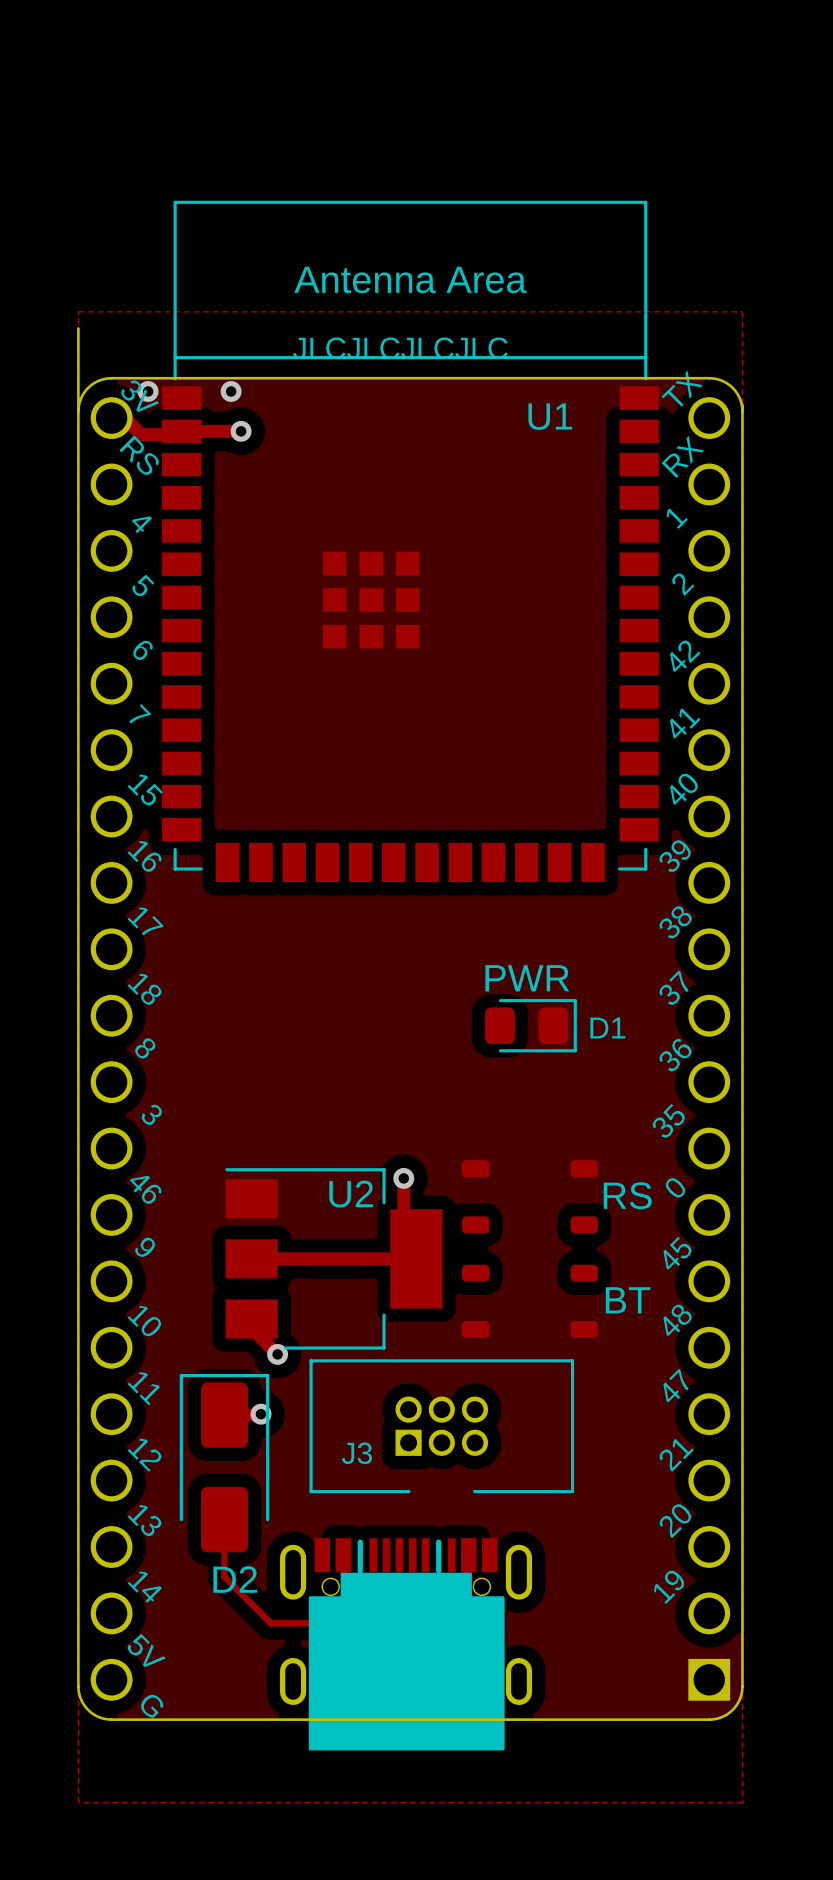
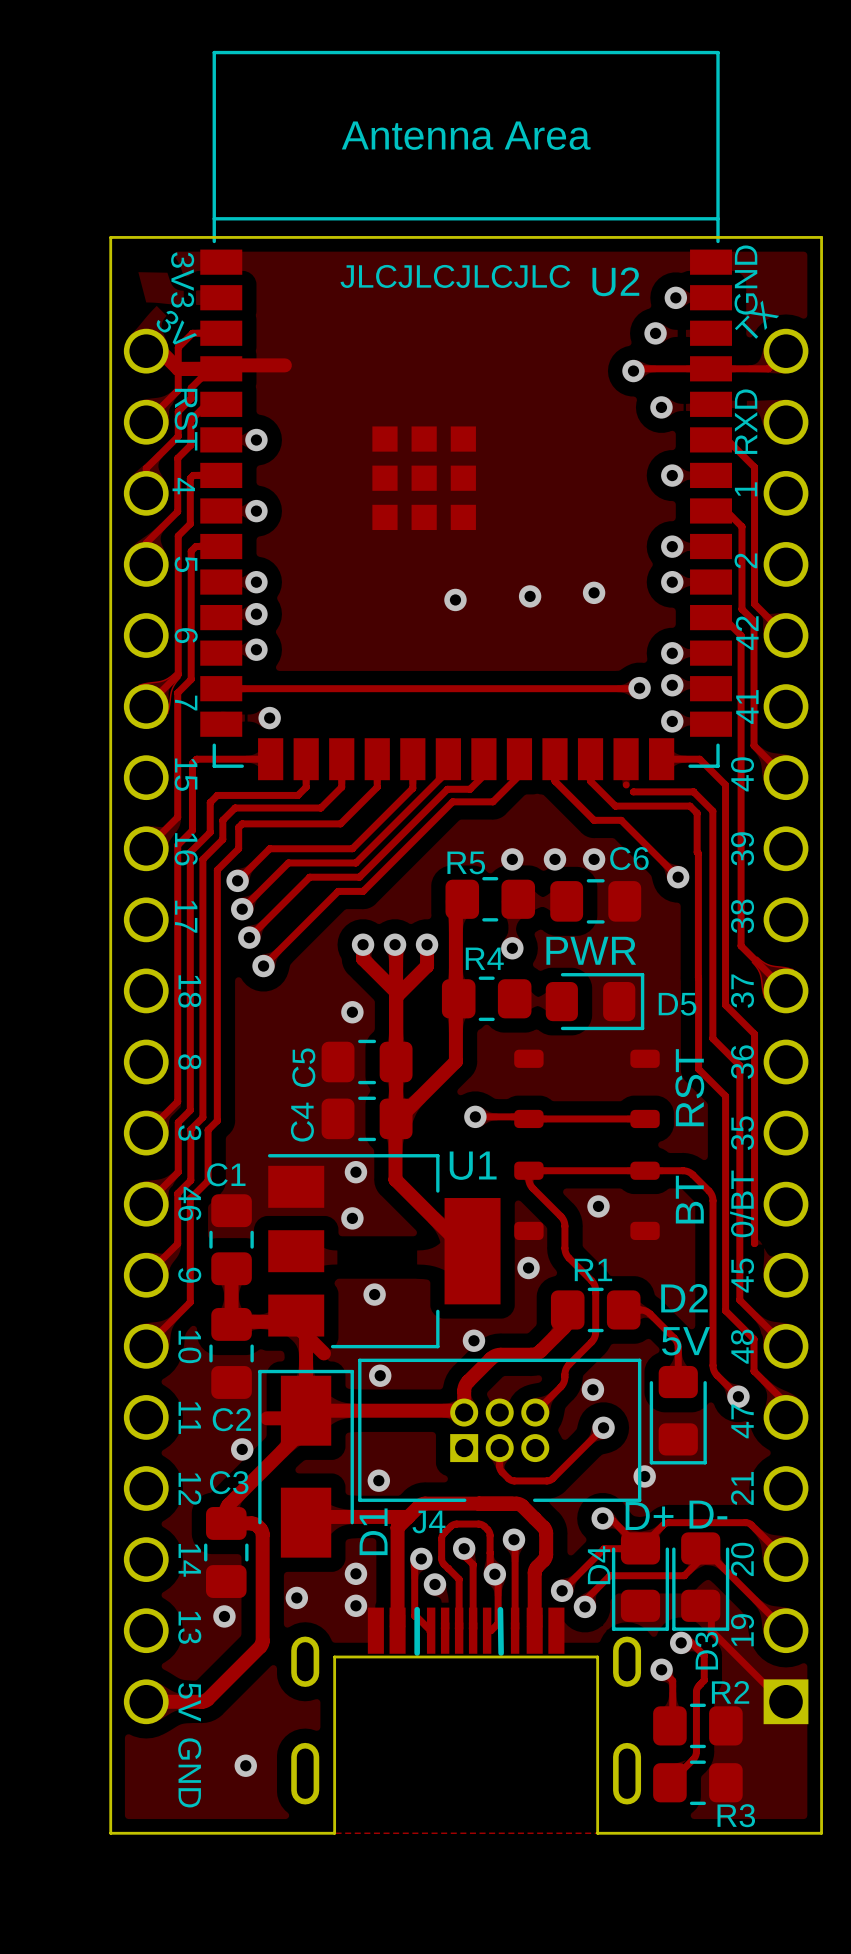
board edge: none -> (110, 255) (110, 237) (821, 237) (821, 336)
text: none -> 3V3 (182, 279)
text: none -> GND (746, 280)
via: none -> (675, 297)
via: (148, 391) -> none
via: (231, 391) -> none
track: none -> (221, 333) (192, 333) (178, 347) (178, 390) (146, 422)
via: none -> (655, 333)
board edge: (78, 411) (81, 397) (88, 387) (100, 380) (111, 378) (709, 378) (723, 381) (732, 387) (740, 400) (742, 411) -> none
track: none -> (786, 351) (768, 368) (634, 368) (633, 371)
via: (241, 431) -> none
track: none -> (178, 368) (210, 368) (191, 387) (191, 398) (178, 411) (178, 436) (146, 468) (146, 493)
via: none -> (633, 371)
text: RS (139, 455) -> RST (186, 419)
text: RX (682, 456) -> RXD (746, 421)
track: none -> (221, 404) (206, 404) (190, 420) (190, 445) (177, 458) (177, 511) (146, 543) (146, 564)
via: none -> (661, 407)
U2: none -> (466, 415)
track: none -> (711, 439) (727, 439) (754, 467) (754, 603) (786, 635)
via: none -> (256, 440)
text rotation: 0° (677, 518) -> 45° counterclockwise (746, 489)
text rotation: 0° (141, 524) -> 45° clockwise (183, 486)
track: none -> (221, 475) (193, 475) (190, 478) (190, 523) (178, 536) (178, 674) (146, 706)
via: none -> (672, 475)
U1: (410, 541) -> none
via: none -> (256, 511)
track: none -> (711, 510) (726, 511) (741, 526) (741, 609) (754, 621) (754, 745) (786, 777)
text rotation: 0° (683, 584) -> 45° counterclockwise (745, 560)
text rotation: 0° (143, 585) -> 45° clockwise (186, 564)
track: none -> (221, 546) (196, 546) (191, 551) (191, 679) (177, 693) (177, 817) (146, 848)
via: none -> (672, 546)
via: none -> (256, 582)
via: none -> (672, 582)
via: none -> (594, 592)
via: none -> (530, 596)
text rotation: 0° (143, 650) -> 45° clockwise (186, 635)
via: none -> (455, 599)
text rotation: 0° (685, 656) -> 45° counterclockwise (747, 633)
via: none -> (256, 614)
track: none -> (711, 617) (723, 617) (741, 635) (741, 945) (786, 990)
via: none -> (256, 649)
via: none -> (672, 653)
text rotation: 0° (140, 713) -> 45° clockwise (186, 703)
zone outline: none -> (175, 672) (164, 680) (138, 685) (138, 714) (167, 713) (172, 688) (180, 677) (175, 672)
text rotation: 0° (685, 723) -> 45° counterclockwise (747, 707)
via: none -> (672, 685)
track: none -> (639, 688) (221, 688)
via: none -> (639, 688)
via: none -> (269, 718)
via: none -> (672, 721)
text rotation: 0° (145, 789) -> 45° clockwise (186, 774)
text rotation: 0° (684, 789) -> 45° counterclockwise (742, 774)
track: none -> (270, 759) (196, 759) (192, 763) (192, 830) (177, 845) (177, 1101) (146, 1133)
track: none -> (306, 759) (306, 787) (297, 795) (217, 795) (210, 802) (210, 832) (190, 852) (190, 1110) (178, 1122) (178, 1172) (146, 1204)
track: none -> (341, 759) (341, 787) (321, 807) (235, 808) (222, 820) (222, 839) (202, 859) (202, 1117) (190, 1129) (190, 1180) (177, 1193) (177, 1243) (146, 1275)
track: none -> (377, 759) (377, 787) (340, 823) (242, 823) (238, 827) (238, 848) (217, 870) (217, 1120) (208, 1130) (208, 1180) (190, 1198) (190, 1302) (146, 1346)
track: none -> (412, 759) (412, 788) (352, 848) (269, 848) (237, 880)
track: none -> (448, 759) (448, 770) (356, 862) (288, 863) (242, 909)
track: none -> (483, 759) (483, 775) (470, 789) (447, 789) (359, 877) (309, 877) (249, 937)
track: none -> (519, 759) (519, 775) (493, 801) (452, 801) (363, 891) (338, 891) (263, 966)
track: none -> (554, 759) (555, 781) (593, 820) (621, 820) (678, 877)
track: none -> (590, 759) (590, 781) (615, 806) (689, 806) (697, 813) (698, 977)
track: none -> (661, 759) (699, 759) (725, 785) (725, 1004) (754, 1034) (754, 1243)
track: none -> (626, 784) (626, 784)
track: none -> (633, 791) (693, 791)
track: none -> (693, 791) (712, 811) (712, 1038) (739, 1065) (739, 1300) (786, 1346)
text rotation: 0° (145, 856) -> 45° clockwise (186, 849)
text rotation: 0° (675, 856) -> 45° counterclockwise (742, 848)
via: none -> (512, 859)
via: none -> (554, 859)
via: none -> (594, 859)
via: none -> (678, 877)
via: none -> (237, 880)
text rotation: 0° (145, 921) -> 45° clockwise (186, 916)
text rotation: 0° (675, 922) -> 45° counterclockwise (742, 916)
R5: none -> (490, 899)
track: none -> (459, 902) (455, 905) (455, 1061) (398, 1118) (396, 1118) (395, 944)
C6: none -> (595, 901)
via: none -> (242, 909)
via: none -> (249, 937)
track: none -> (363, 944) (363, 959) (396, 992)
via: none -> (363, 944)
via: none -> (395, 944)
track: none -> (427, 944) (426, 966) (396, 997)
via: none -> (427, 944)
via: none -> (512, 948)
zone outline: none -> (757, 956) (767, 964) (793, 969) (793, 998) (764, 998) (759, 972) (752, 961) (757, 956)
text rotation: 0° (673, 987) -> 45° counterclockwise (742, 991)
text rotation: 0° (144, 989) -> 45° clockwise (189, 991)
via: none -> (263, 966)
track: none -> (698, 977) (698, 1068) (725, 1096) (725, 1310) (753, 1339) (754, 1371) (785, 1403) (786, 1417)
R4: none -> (486, 998)
D1 name: D1 (607, 1028) -> D5 (677, 1004)
via: none -> (352, 1012)
text rotation: 0° (145, 1048) -> 45° clockwise (189, 1062)
text rotation: 0° (675, 1054) -> 45° counterclockwise (742, 1062)
C5: none -> (367, 1062)
part: none -> RST (586, 1088)
text rotation: 0° (151, 1114) -> 45° clockwise (189, 1133)
text rotation: 0° (668, 1120) -> 45° counterclockwise (742, 1133)
track: none -> (475, 1116) (645, 1118)
C4: none -> (367, 1118)
track: none -> (395, 1122) (395, 1179) (472, 1257)
track: (403, 1178) (403, 1246) (416, 1258) (251, 1258) -> none
via position: (403, 1178) -> (475, 1116)
via: none -> (355, 1172)
text: 0 (675, 1187) -> none
text rotation: 0° (146, 1189) -> 45° clockwise (189, 1203)
U2 name: U2 (351, 1194) -> U1 (473, 1165)
part value: RS (627, 1195) -> BT (689, 1199)
part position: (529, 1196) -> (586, 1200)
text: none -> 0/BT (742, 1203)
via: none -> (598, 1206)
via: none -> (352, 1218)
text rotation: 0° (145, 1247) -> 45° clockwise (189, 1275)
C1: none -> (231, 1239)
text rotation: 0° (677, 1253) -> 45° counterclockwise (742, 1275)
via: none -> (528, 1267)
track: none -> (231, 1268) (231, 1324) (234, 1321) (293, 1321) (305, 1331) (305, 1425) (226, 1509) (226, 1523) (253, 1523) (262, 1532) (261, 1644) (205, 1700) (146, 1701)
via: none -> (374, 1294)
part: BT (529, 1301) -> none
track: none -> (567, 1309) (567, 1319) (564, 1326) (538, 1352) (532, 1354) (498, 1354) (490, 1358) (465, 1384) (464, 1412)
R1: none -> (595, 1309)
track: none -> (623, 1309) (646, 1311) (675, 1339) (678, 1346) (678, 1382)
text rotation: 0° (677, 1320) -> 45° counterclockwise (742, 1346)
text rotation: 0° (144, 1321) -> 45° clockwise (189, 1346)
via: none -> (473, 1340)
D2 value: none -> 5V (685, 1341)
C2: none -> (231, 1353)
via: (277, 1354) -> none
D2 footprint: [179, 1373, 270, 1553] -> [649, 1365, 707, 1465]
via: none -> (380, 1375)
text rotation: 0° (676, 1385) -> 45° counterclockwise (742, 1421)
text rotation: 0° (143, 1388) -> 45° clockwise (189, 1417)
via: none -> (592, 1389)
track: none -> (738, 1396) (715, 1374) (713, 1367) (713, 1200) (708, 1190) (691, 1173) (684, 1170) (528, 1170) (529, 1180) (531, 1187) (563, 1220) (566, 1255) (592, 1281) (595, 1290) (595, 1332) (593, 1339) (567, 1366) (562, 1385) (535, 1412)
via: none -> (738, 1396)
track: none -> (306, 1410) (470, 1410)
via: (261, 1414) -> none
track: none -> (603, 1427) (548, 1480) (509, 1479) (500, 1468) (499, 1448)
via: none -> (603, 1427)
via: none -> (242, 1449)
J3 name: J3 (356, 1453) -> J4 (428, 1521)
text rotation: 0° (144, 1455) -> 45° clockwise (189, 1488)
text rotation: 0° (676, 1455) -> 45° counterclockwise (742, 1488)
D1: none -> (306, 1463)
via: none -> (644, 1476)
via: none -> (378, 1480)
track: none -> (408, 1516) (326, 1516) (316, 1525)
track: none -> (602, 1518) (612, 1520) (640, 1548) (667, 1522) (747, 1522) (786, 1559)
via: none -> (602, 1518)
track: (224, 1519) (224, 1576) (270, 1623) (367, 1623) (380, 1610) -> none
text rotation: 0° (144, 1520) -> 45° clockwise (189, 1627)
text position: 13 (144, 1520) -> 13 (189, 1627)
text rotation: 0° (675, 1520) -> 45° counterclockwise (742, 1559)
track: none -> (513, 1539) (515, 1630)
via: none -> (513, 1539)
track: none -> (464, 1548) (465, 1556) (473, 1564) (473, 1630)
via: none -> (464, 1548)
track: none -> (650, 1548) (604, 1548) (562, 1590)
track: none -> (700, 1548) (704, 1549) (786, 1630)
track: none -> (710, 1549) (684, 1575) (609, 1575) (585, 1600) (584, 1606)
C3: none -> (226, 1552)
track: none -> (421, 1558) (414, 1565) (414, 1615) (430, 1630)
via: none -> (421, 1558)
track: none -> (448, 1568) (441, 1559) (441, 1538) (443, 1533) (455, 1524) (479, 1524) (483, 1525) (489, 1533) (490, 1568) (498, 1577) (498, 1623) (491, 1630) (487, 1630)
track: none -> (448, 1568) (459, 1579) (459, 1630)
via: none -> (355, 1573)
via: none -> (494, 1574)
D4: none -> D+ (640, 1581)
D3: none -> D- (700, 1581)
via: none -> (434, 1584)
via: none -> (562, 1590)
D2 name position: D2 (235, 1579) -> D2 (684, 1298)
via: none -> (296, 1597)
text rotation: 0° (144, 1587) -> 45° clockwise (189, 1560)
text rotation: 0° (669, 1587) -> 45° counterclockwise (742, 1630)
via: none -> (355, 1605)
track: none -> (711, 1606) (711, 1630) (782, 1701) (786, 1701)
via: none -> (584, 1606)
via: none -> (224, 1616)
track: none -> (397, 1630) (397, 1527) (419, 1505) (425, 1503) (518, 1503) (544, 1528) (546, 1532) (546, 1556) (534, 1572) (534, 1630)
track: none -> (681, 1642) (691, 1642) (704, 1655) (704, 1680) (696, 1691) (695, 1754) (672, 1779)
via: none -> (681, 1642)
part: (406, 1644) -> none
track: none -> (661, 1669) (672, 1681) (672, 1723)
via: none -> (661, 1669)
text rotation: 0° (146, 1650) -> 45° clockwise (189, 1702)
part: none -> (466, 1705)
board edge: (78, 1686) (81, 1700) (88, 1709) (97, 1716) (111, 1719) (709, 1719) (720, 1717) (732, 1709) (739, 1700) (742, 1686) -> (110, 1708) (110, 1833) (334, 1833) (334, 1656) (597, 1656) (597, 1833) (821, 1833) (821, 1708)
R2: none -> (697, 1725)
text: G (152, 1706) -> none
via: none -> (245, 1765)
text: none -> GND (189, 1772)
R3: none -> (697, 1782)

